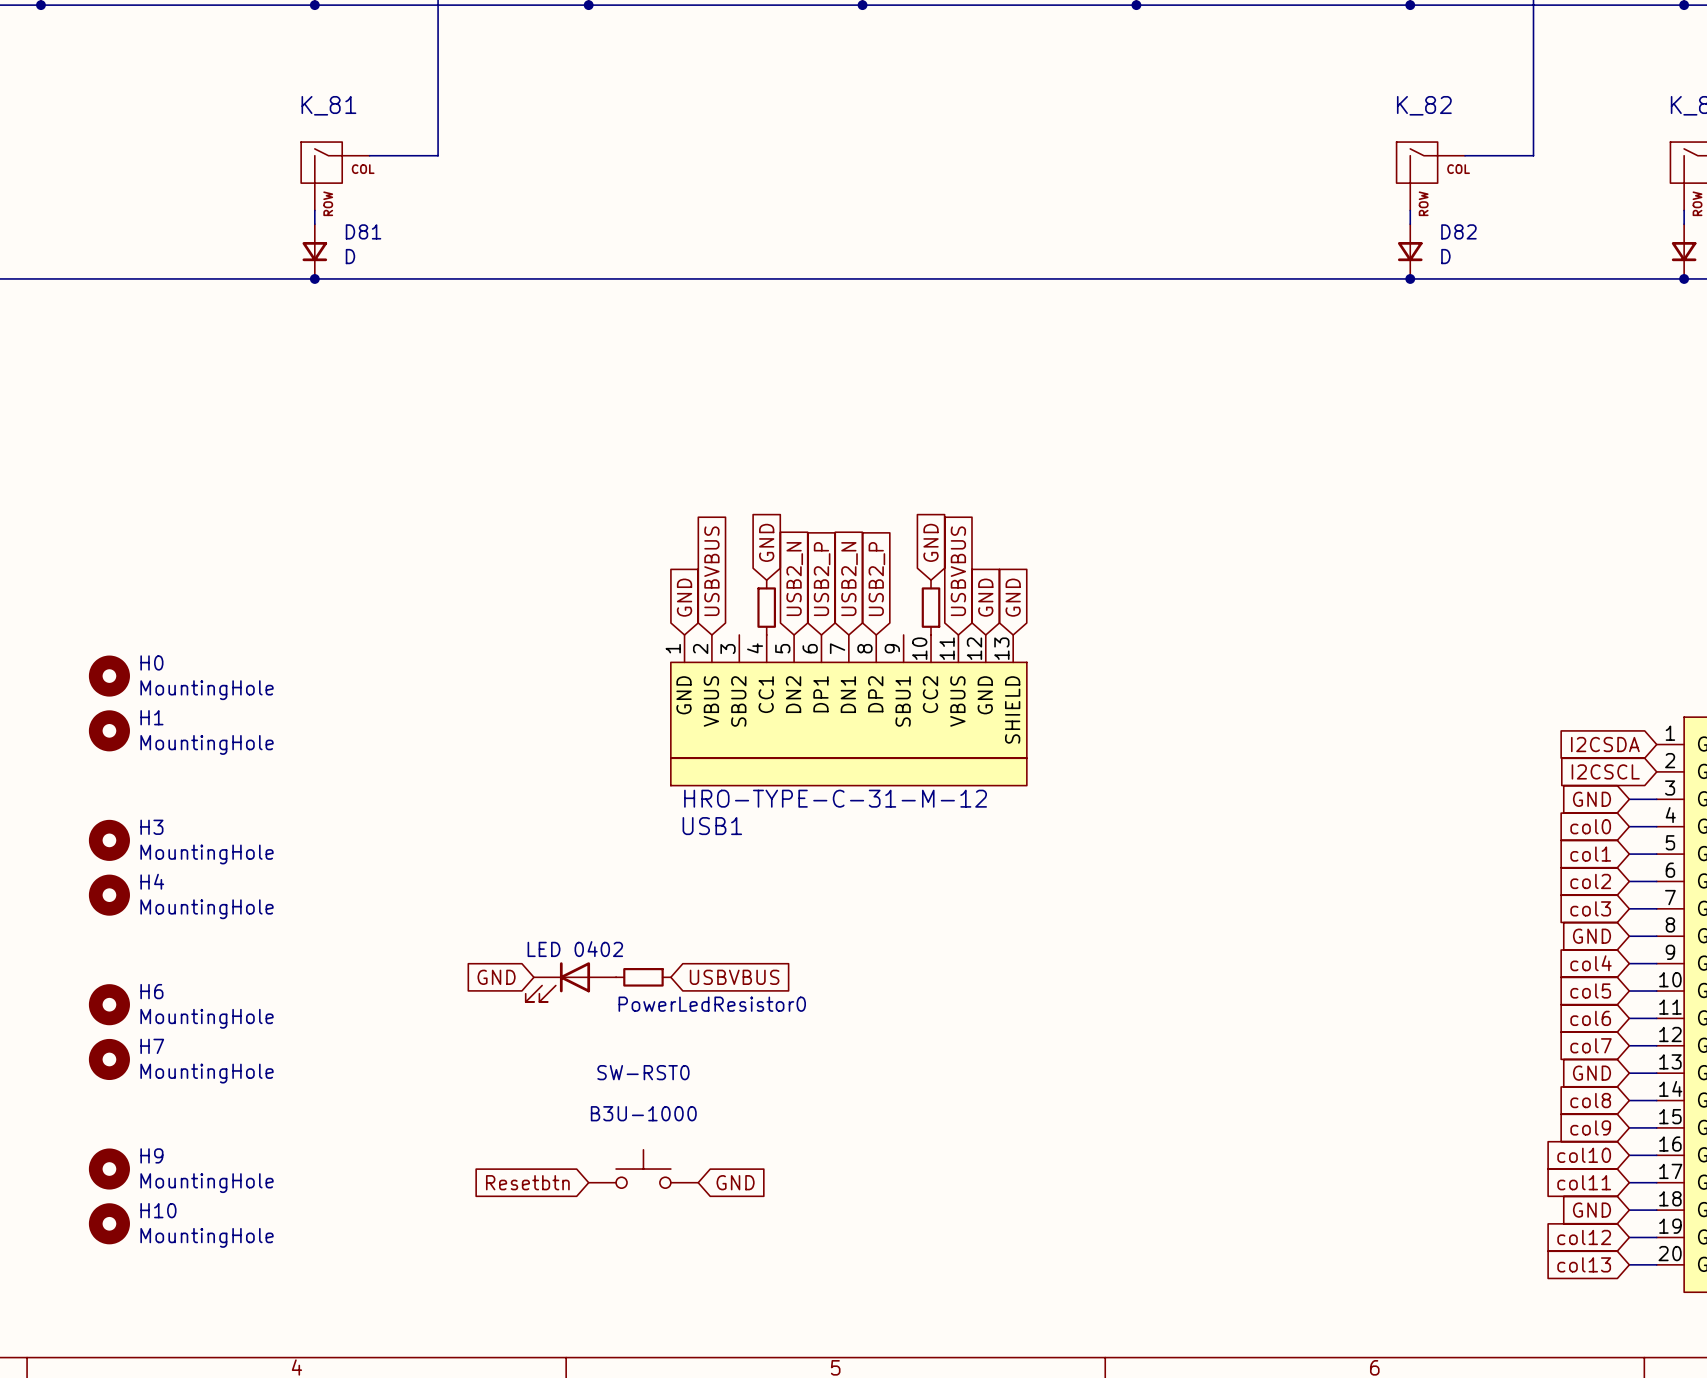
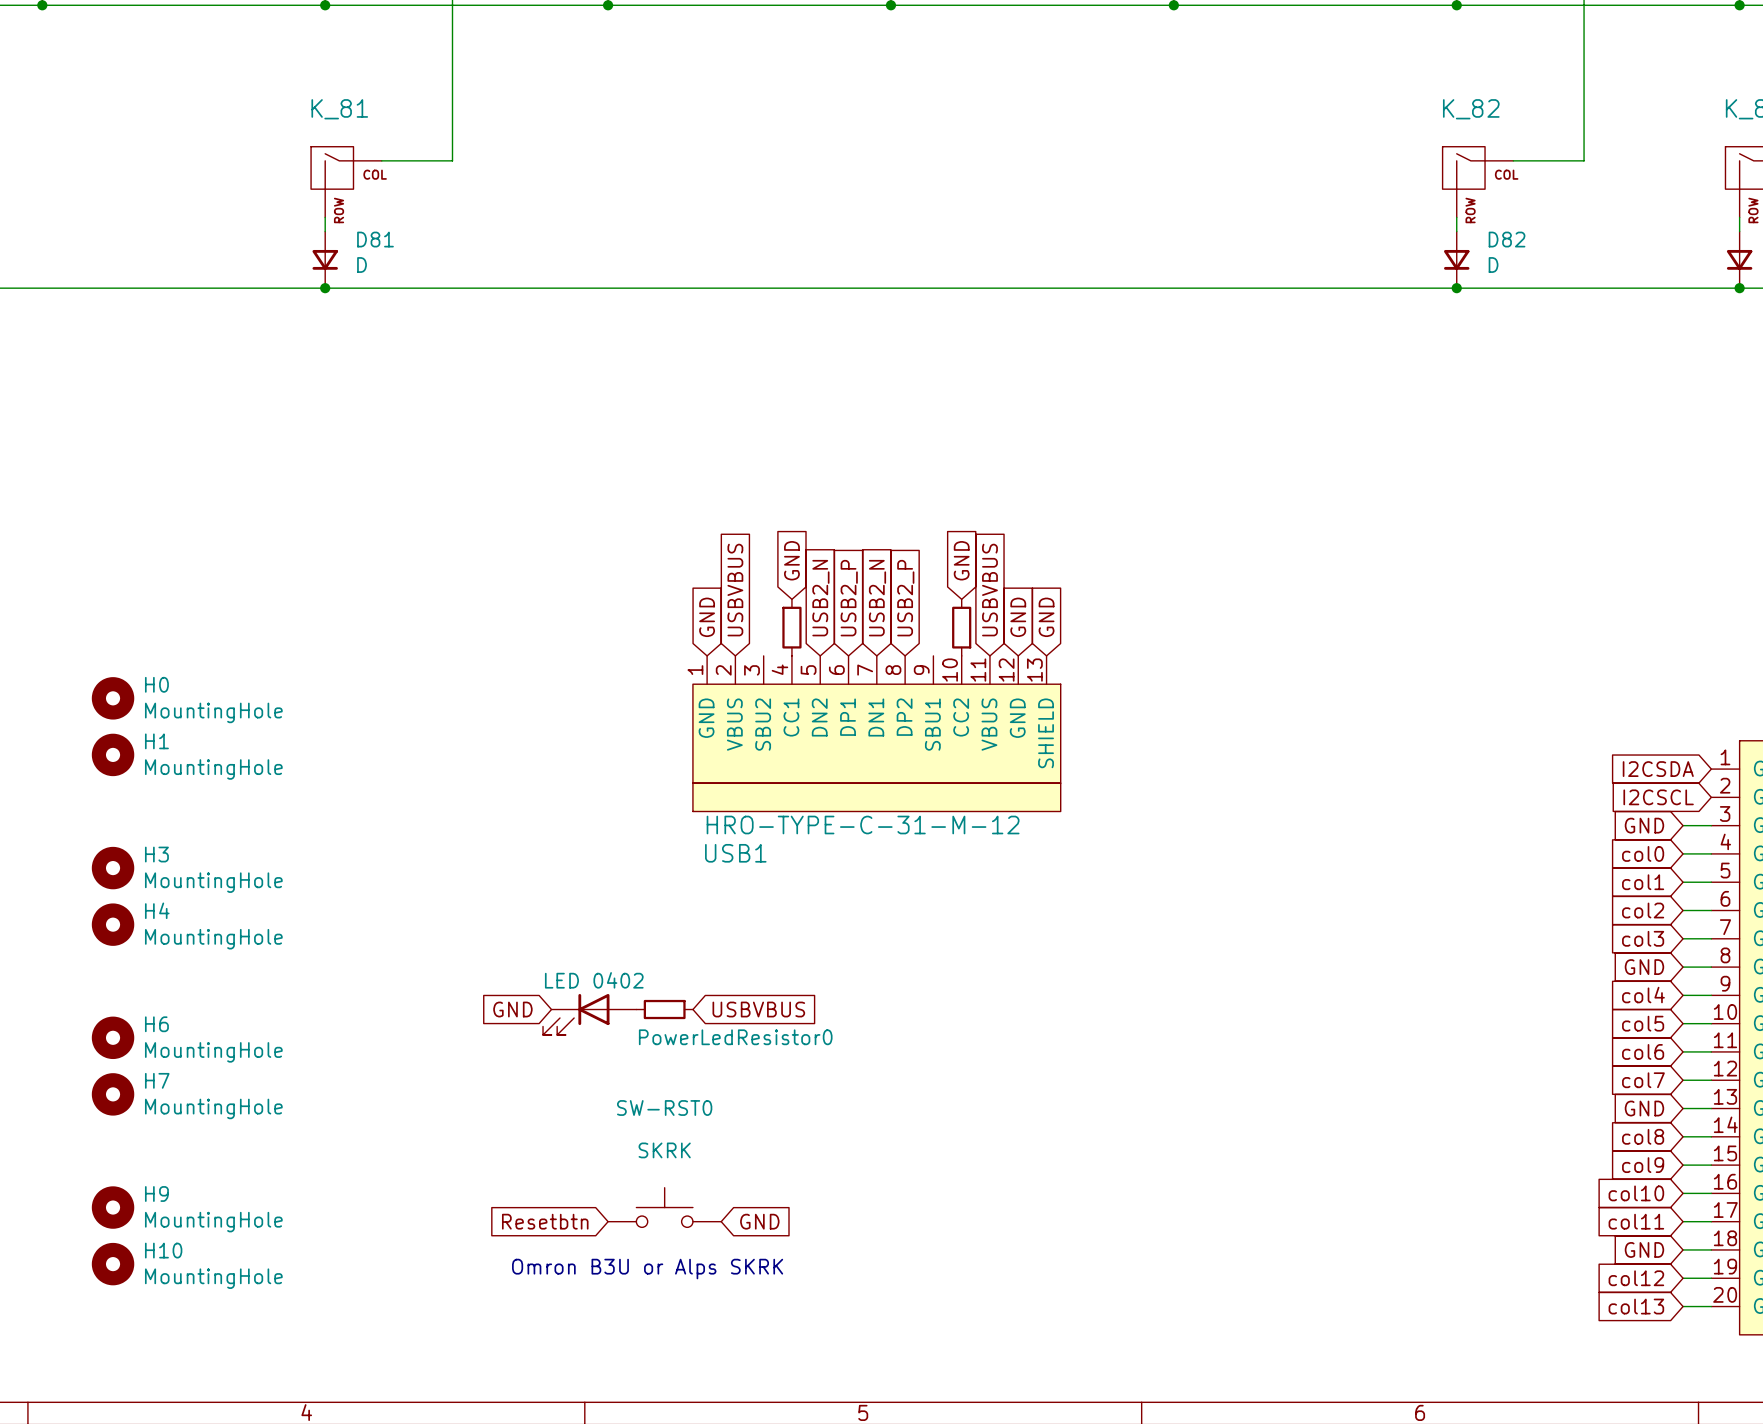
SW-RST0 value: B3U-1000 (643, 1113) -> SKRK (664, 1150)
text: none -> Omron B3U or Alps SKRK (647, 1269)

